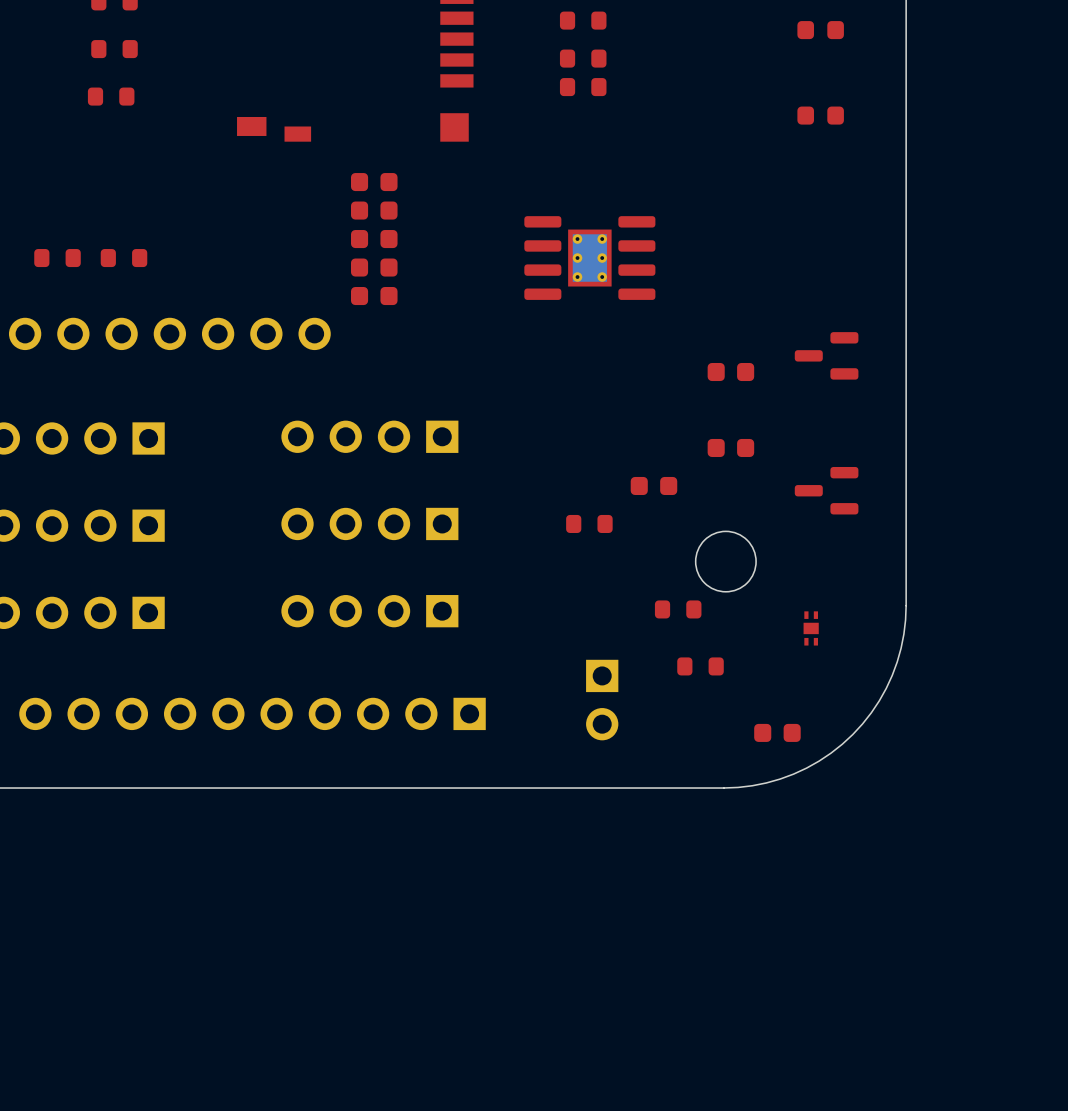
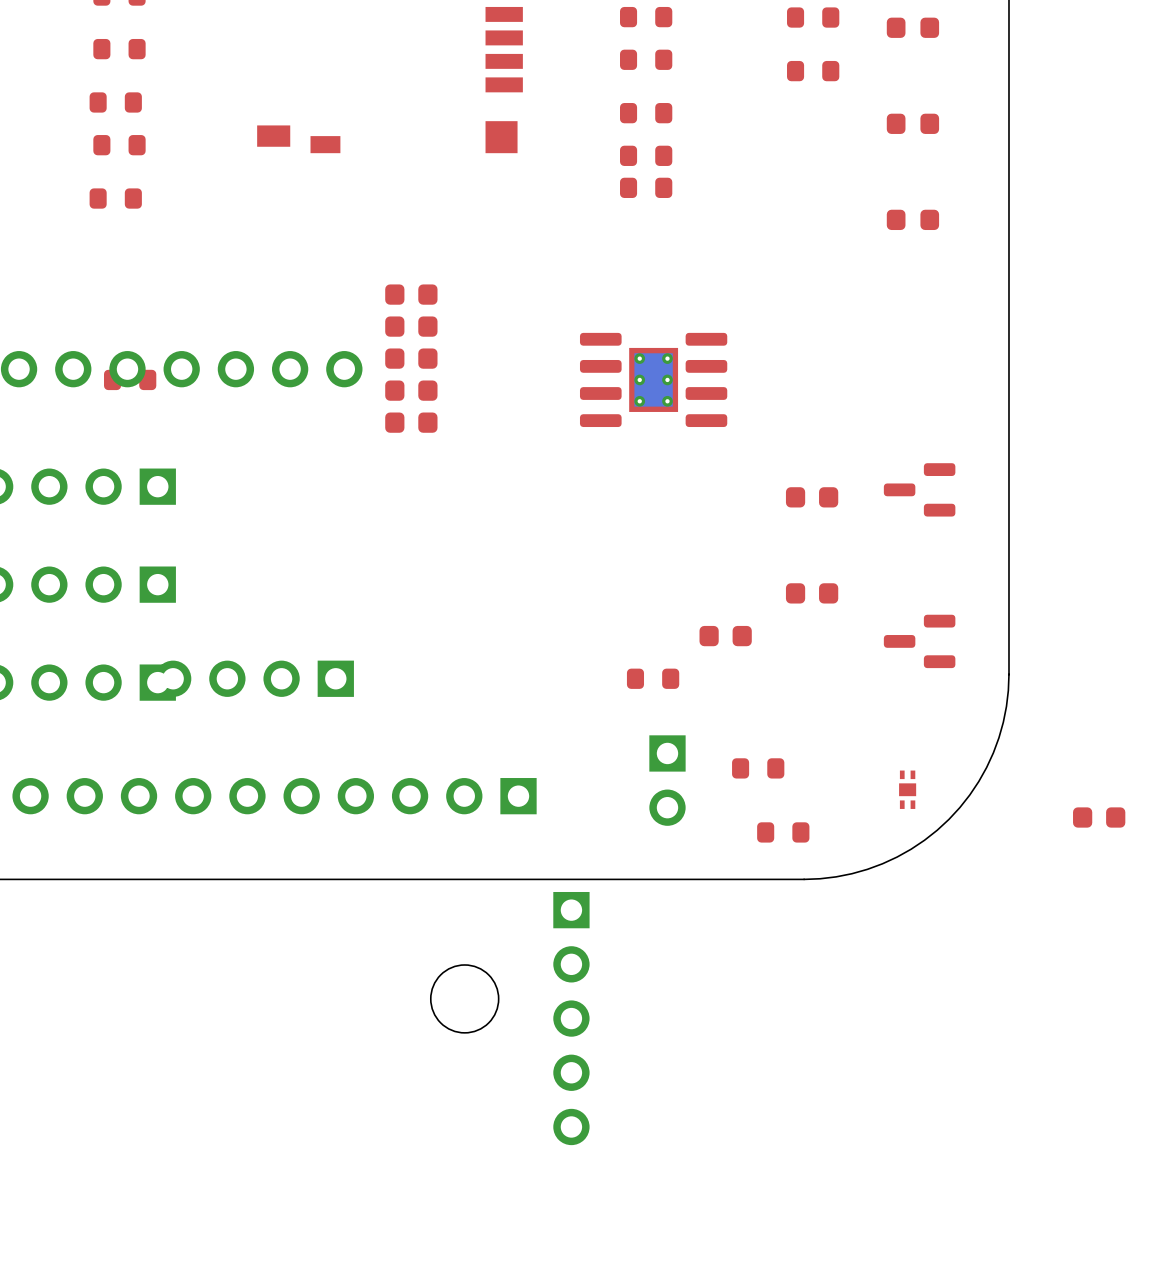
part: none -> (813, 17)
part: none -> (813, 71)
part position: (583, 87) -> (646, 113)
part: none -> (119, 145)
part: none -> (646, 155)
part: none -> (646, 187)
part: none -> (115, 198)
part: (374, 182) -> none
part: none -> (912, 219)
part: (374, 210) -> none
part: (374, 239) -> none
part: (57, 258) -> none
part: (123, 258) -> none
part position: (589, 258) -> (653, 379)
part: none -> (411, 358)
part: none -> (130, 379)
part: none -> (411, 390)
part: (826, 355) -> none
part: (730, 372) -> none
part: none -> (411, 422)
part: (369, 436) -> none
part: none -> (919, 489)
part: (653, 485) -> none
part: (826, 490) -> none
part: (369, 523) -> none
part: (589, 523) -> none
part: none -> (812, 593)
round board edge position: (725, 561) -> (464, 998)
part: none -> (725, 636)
part: none -> (919, 641)
part: none -> (254, 678)
part: none -> (653, 678)
part: (678, 609) -> none
part: (369, 611) -> none
part position: (811, 628) -> (907, 789)
part position: (700, 666) -> (758, 768)
part: (777, 732) -> none
part: none -> (1099, 817)
part: none -> (783, 832)
part: none -> (571, 1018)

